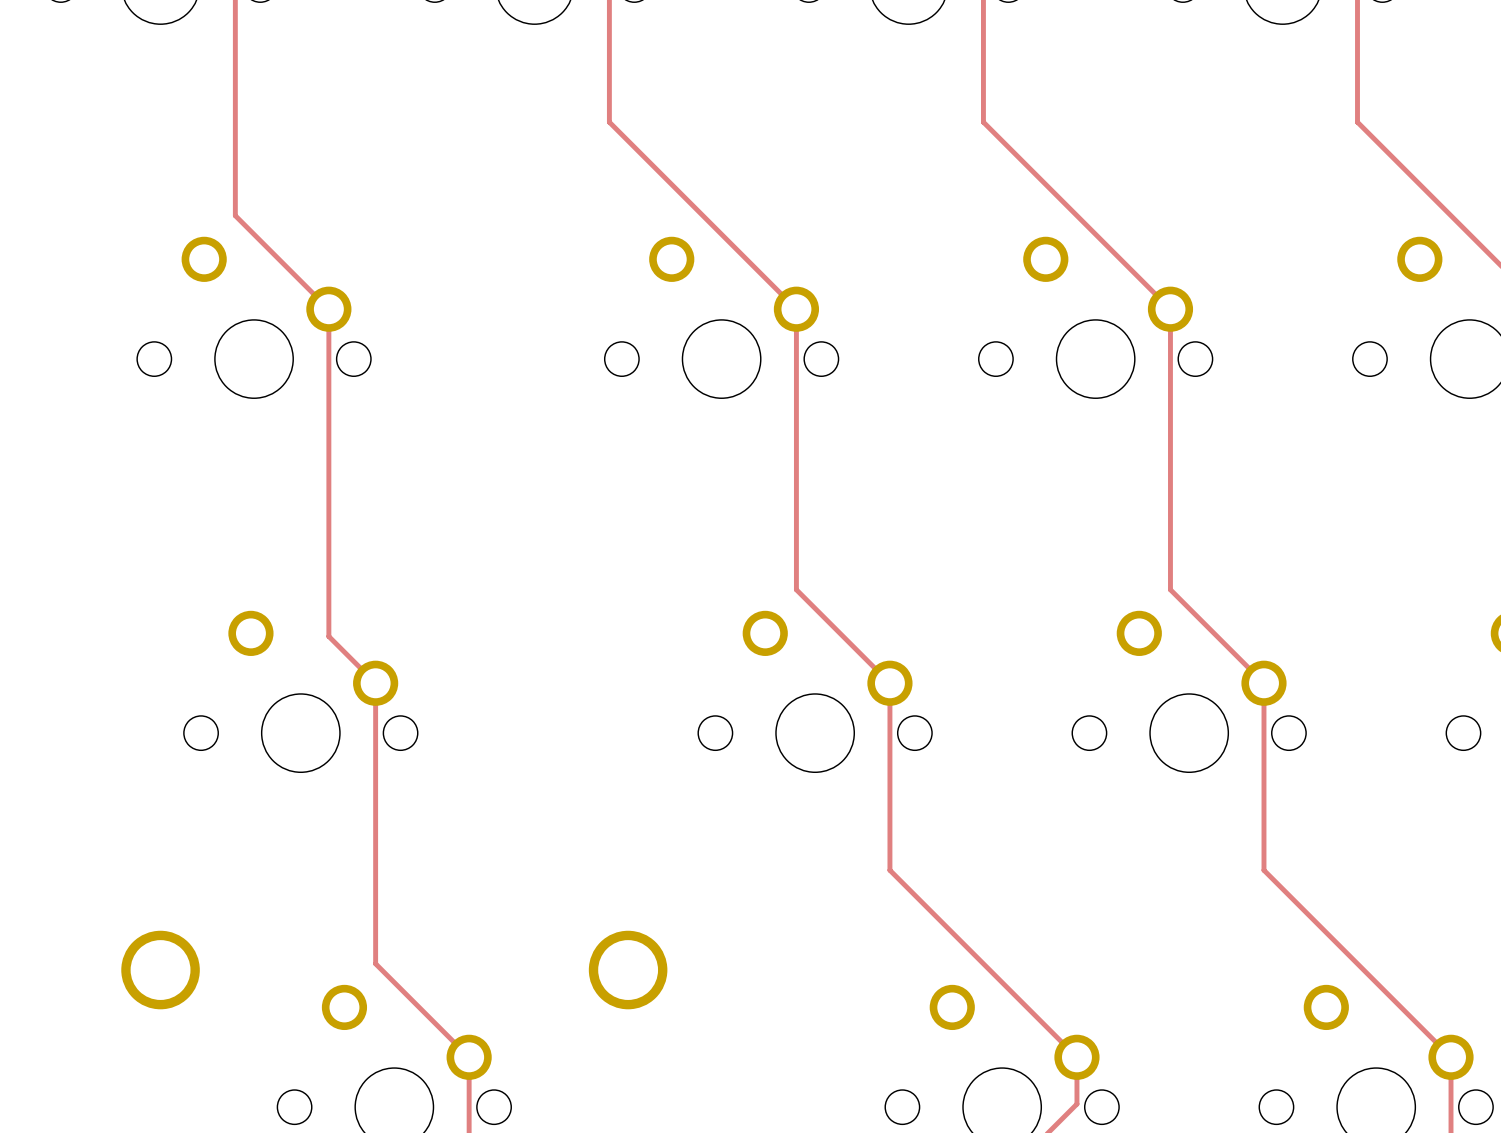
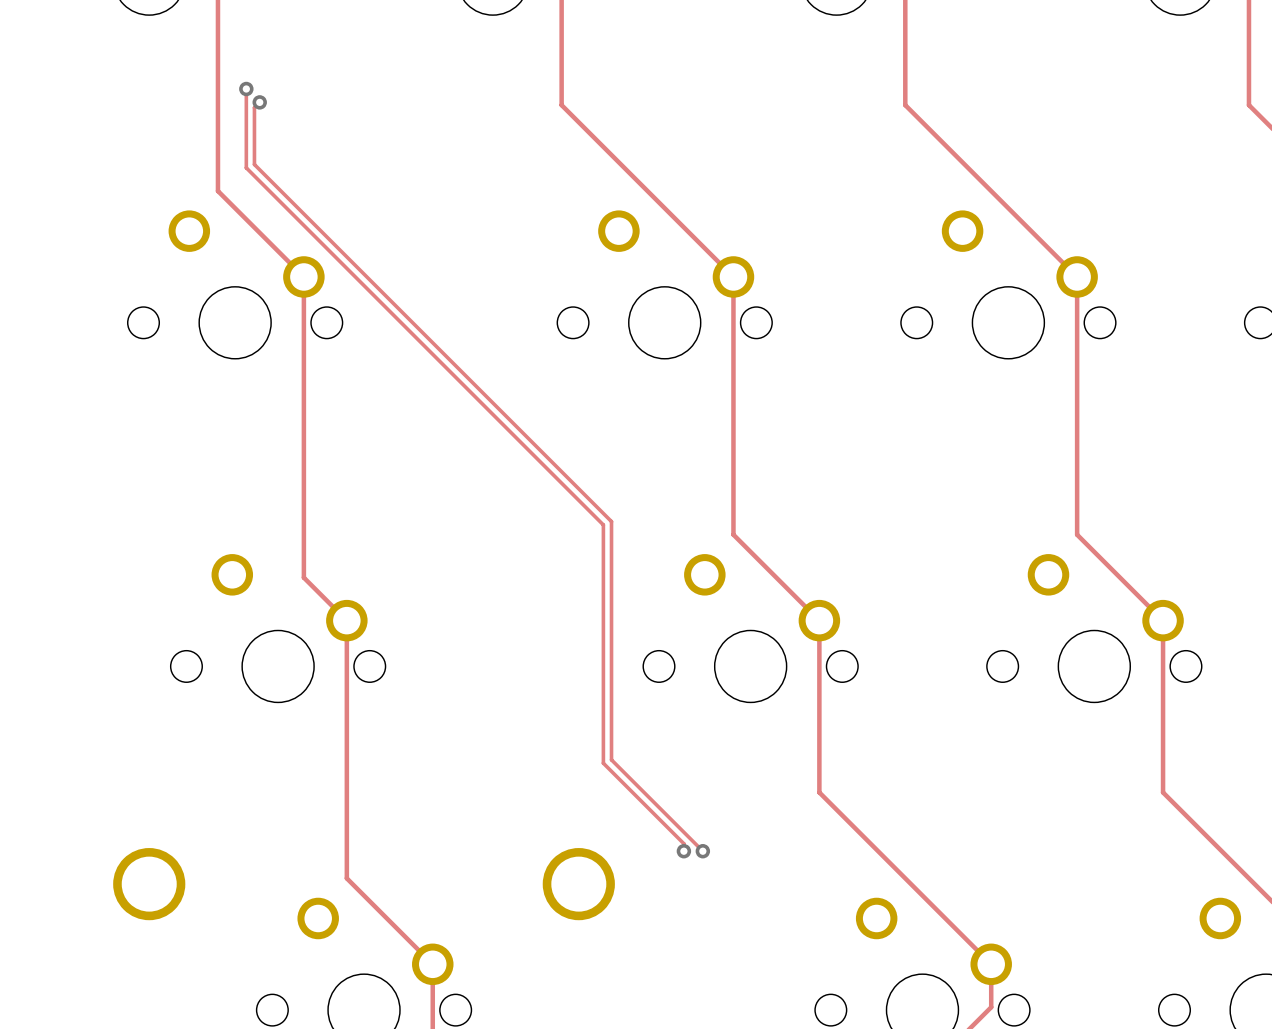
track: none -> (246, 88) (246, 167) (603, 524) (603, 763) (683, 843) (683, 851)
via: none -> (246, 88)
track: none -> (259, 102) (254, 107) (254, 164) (611, 521) (611, 759) (702, 851)
via: none -> (259, 102)
via: none -> (683, 851)
via: none -> (702, 851)

